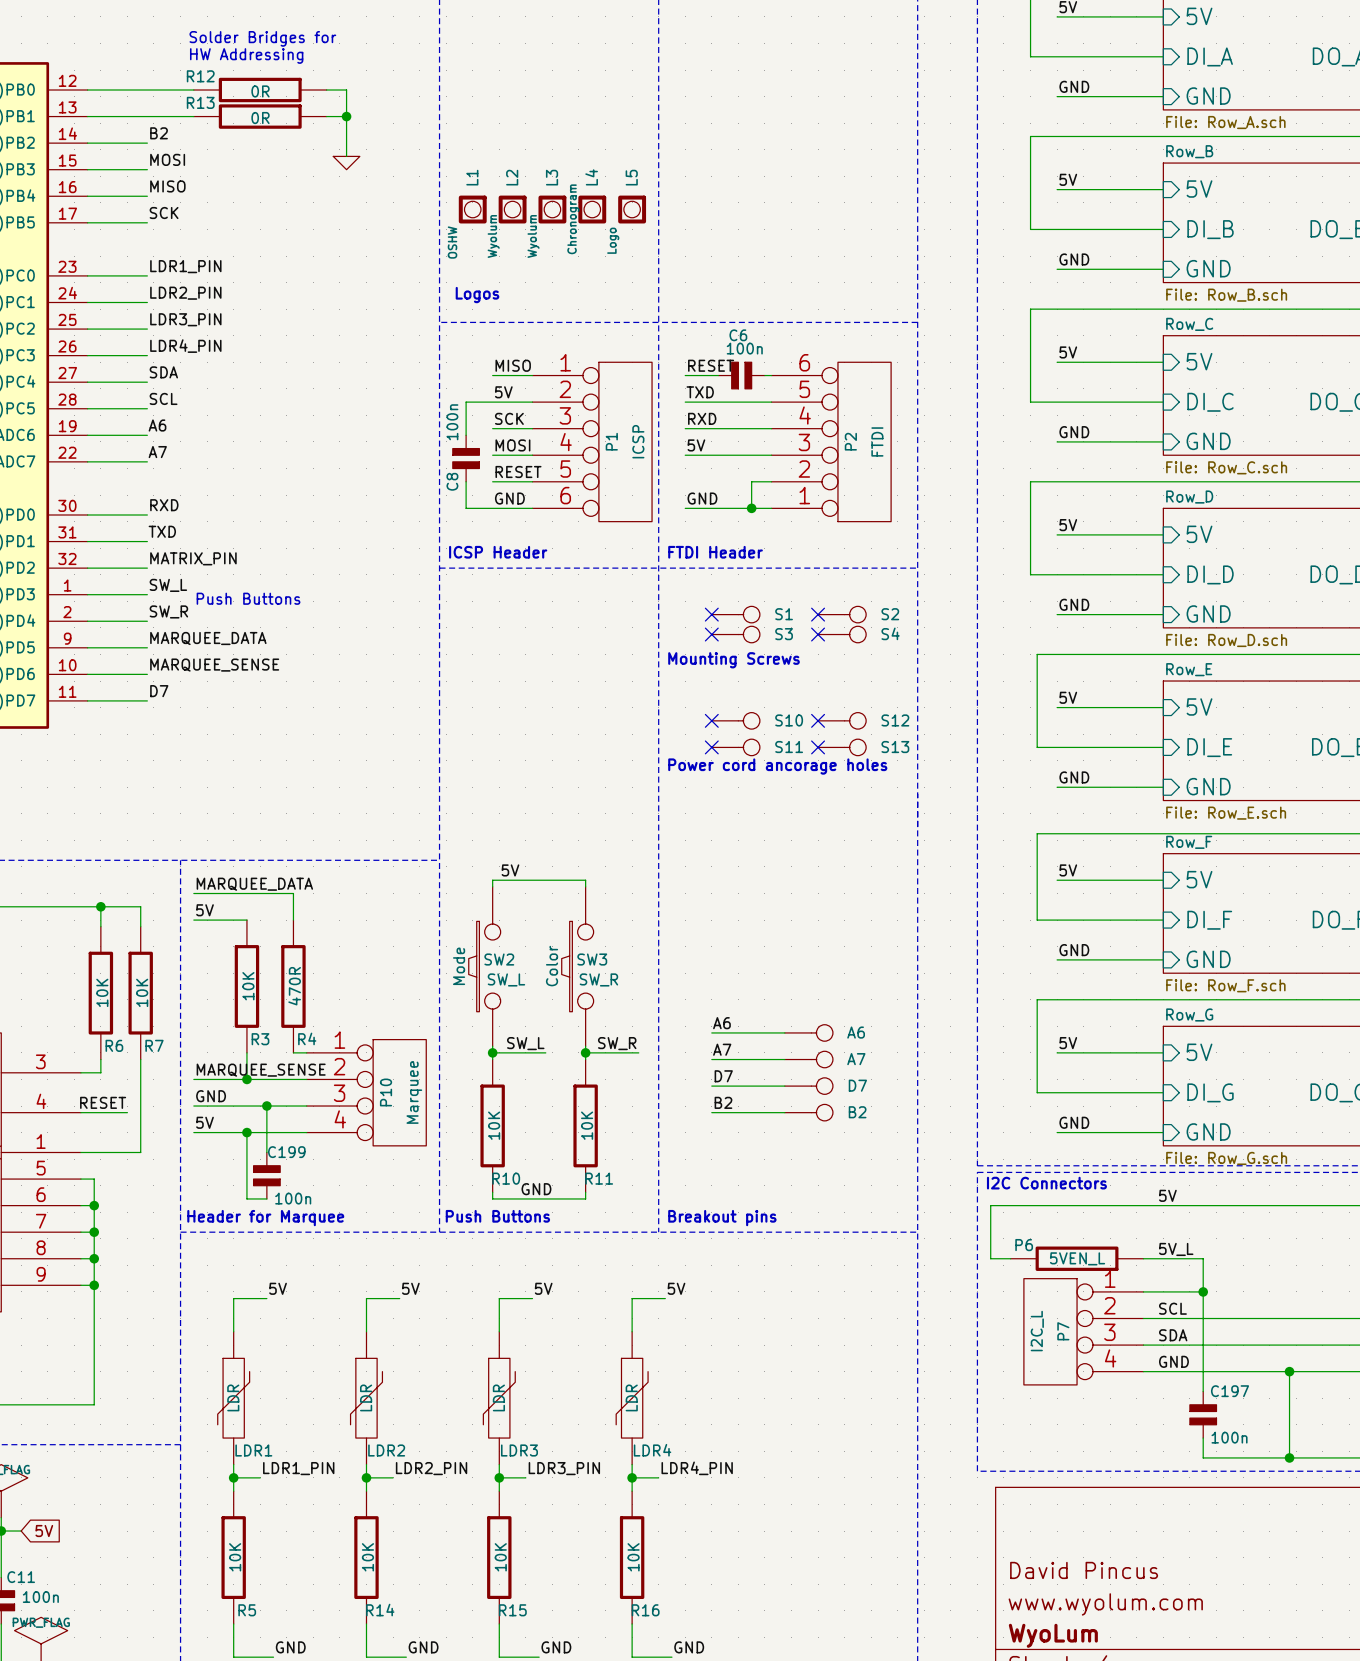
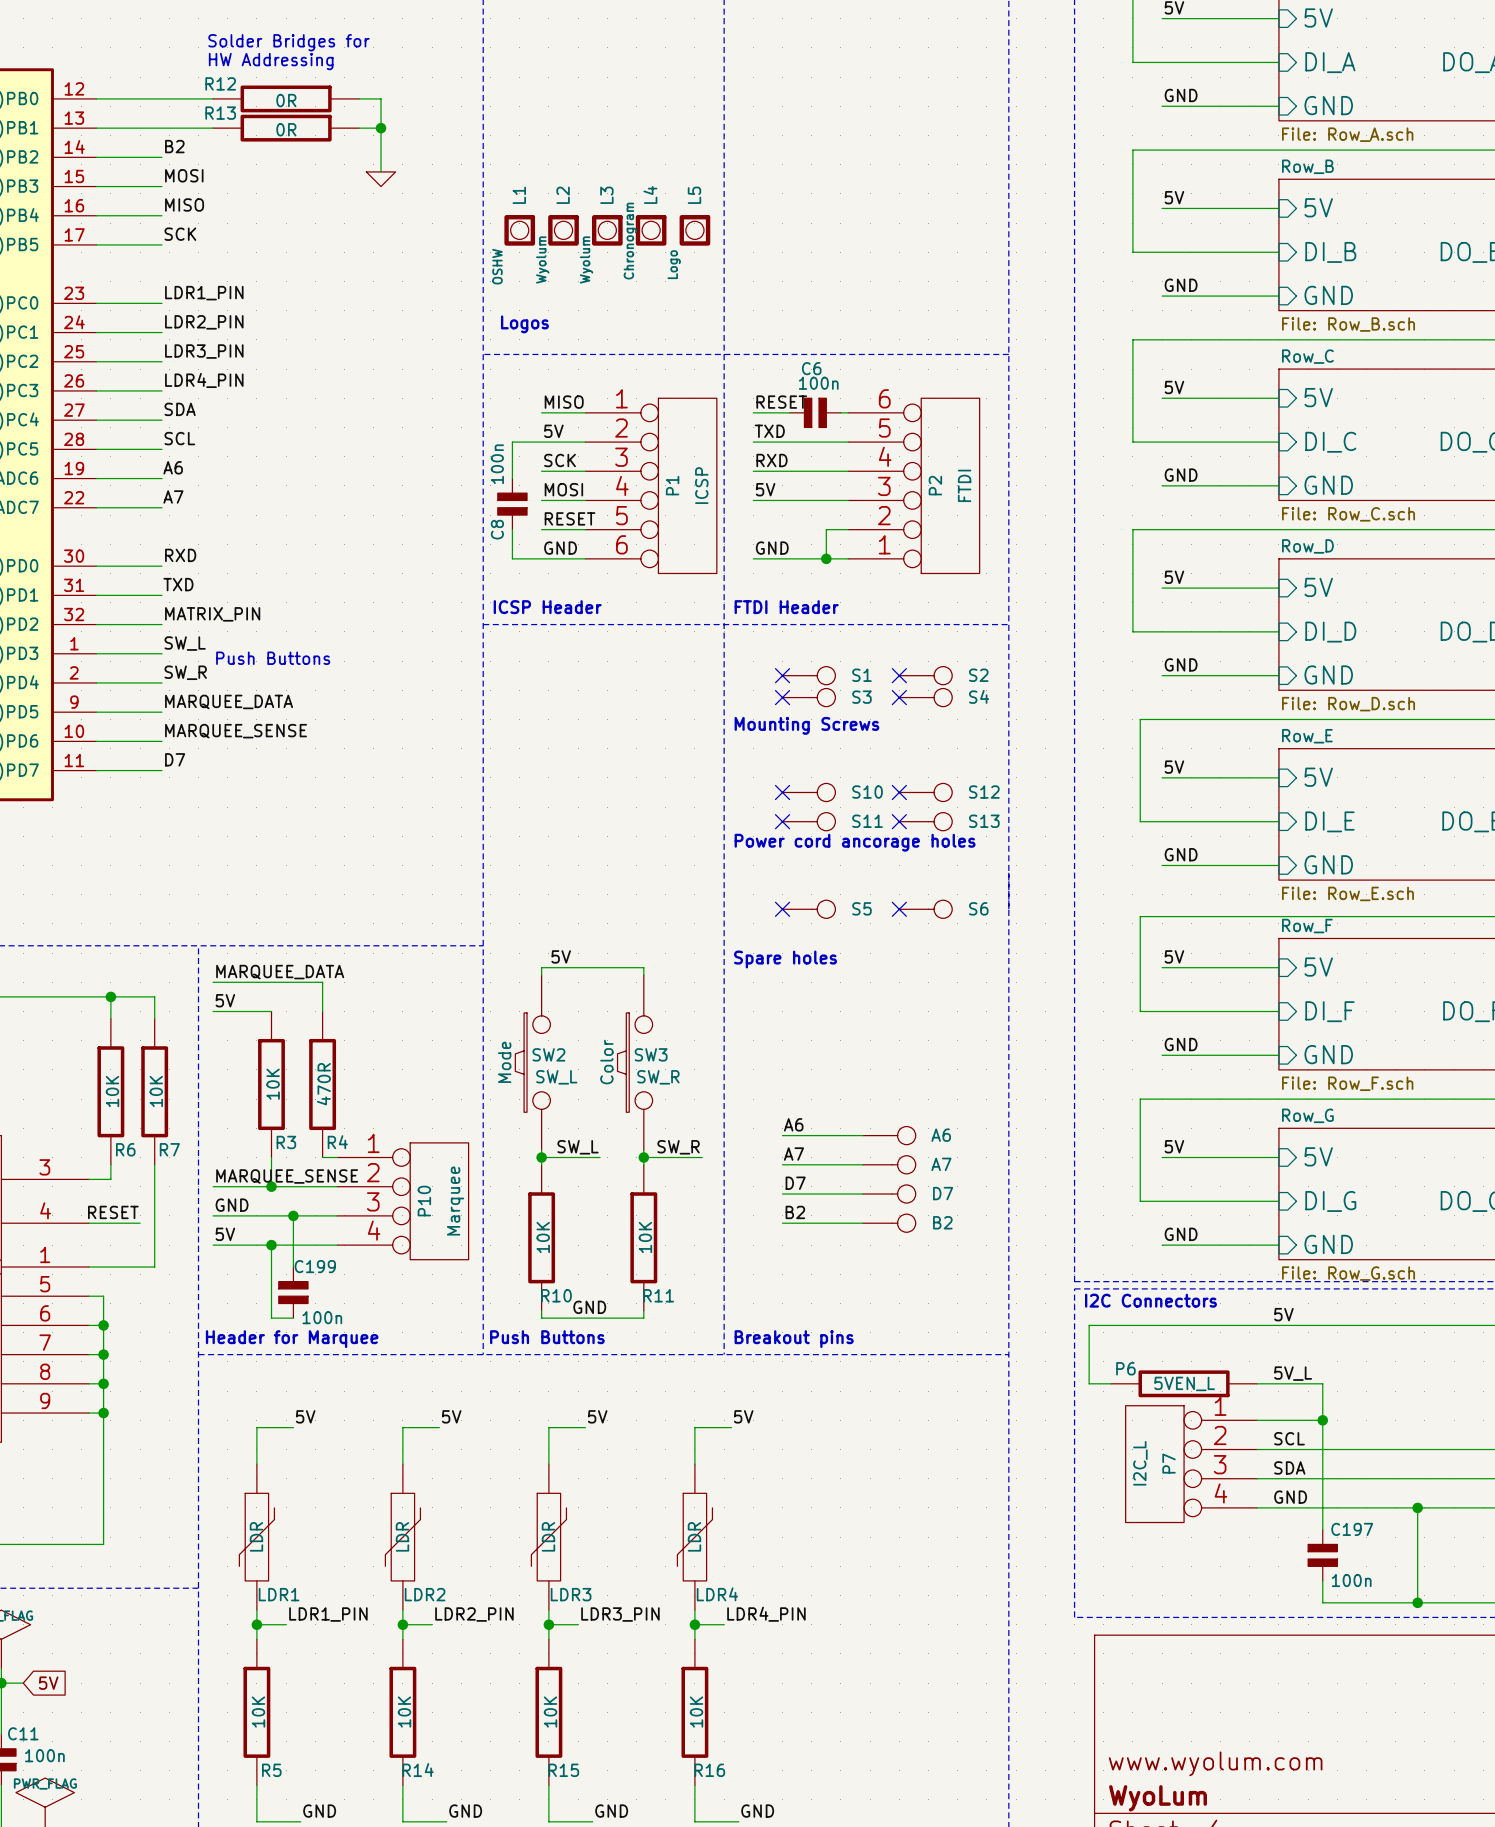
no-connect mark: none -> (782, 909)
S5: none -> (808, 909)
no-connect mark: none -> (899, 909)
S6: none -> (925, 909)
text: none -> Spare holes (785, 959)
title block: David Pincus (1084, 1570) -> none

